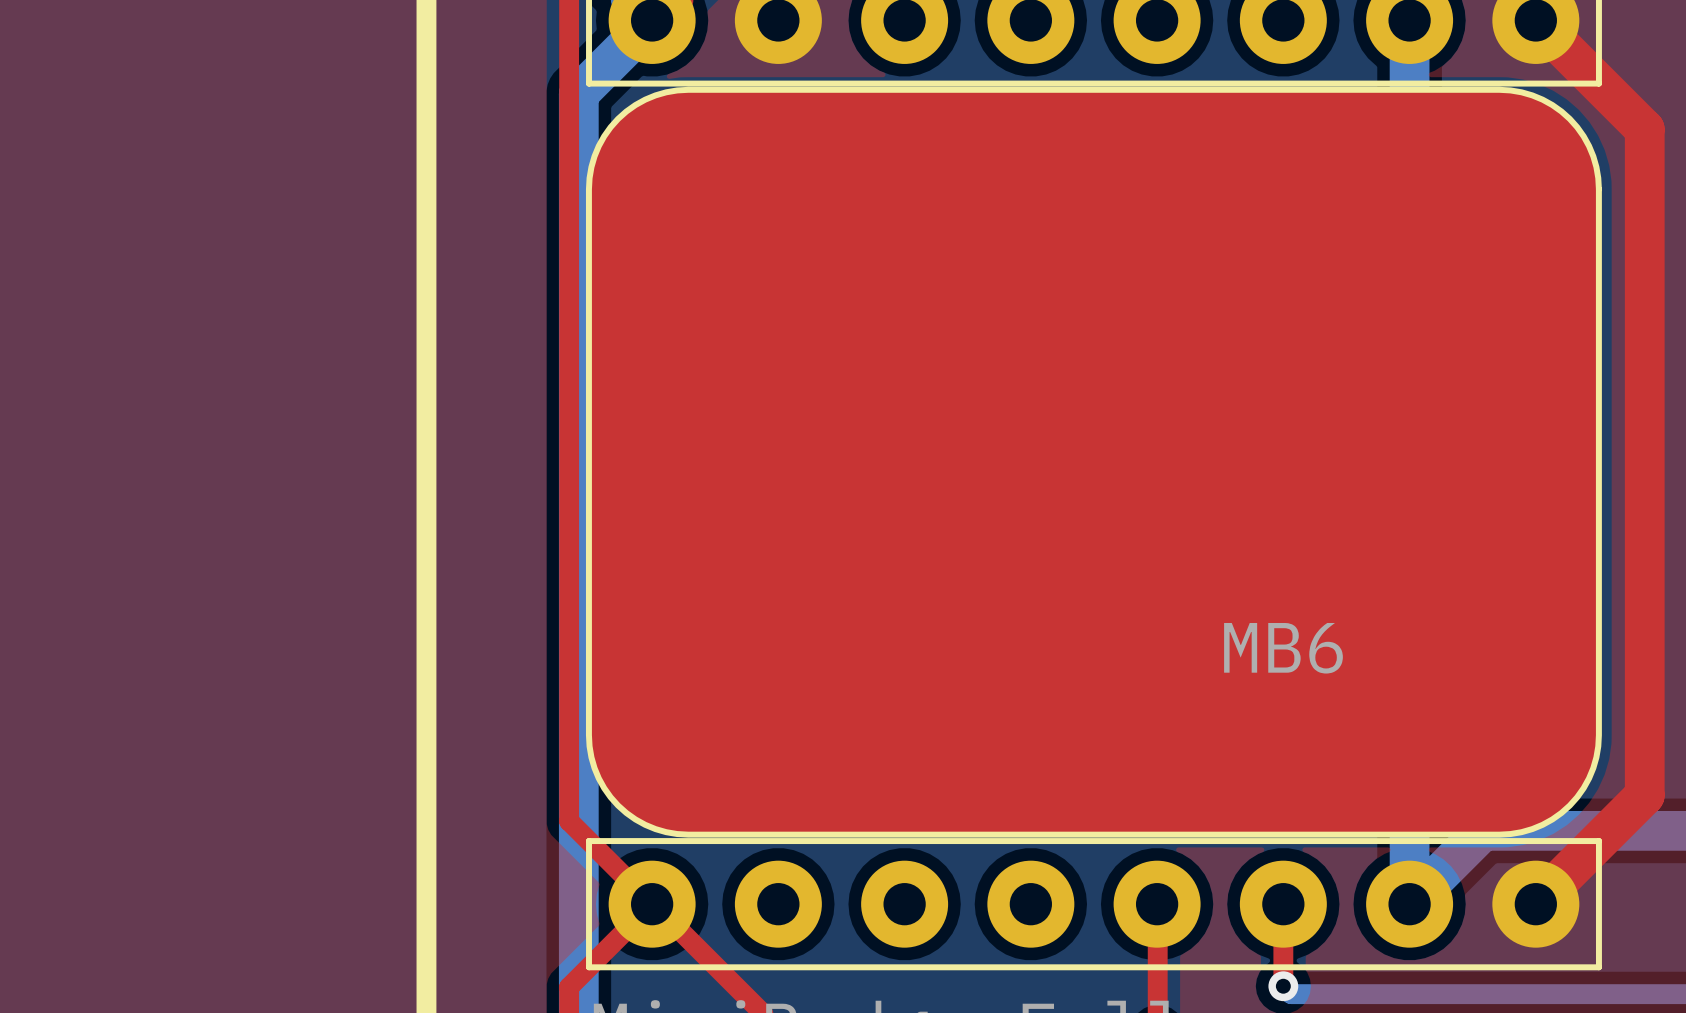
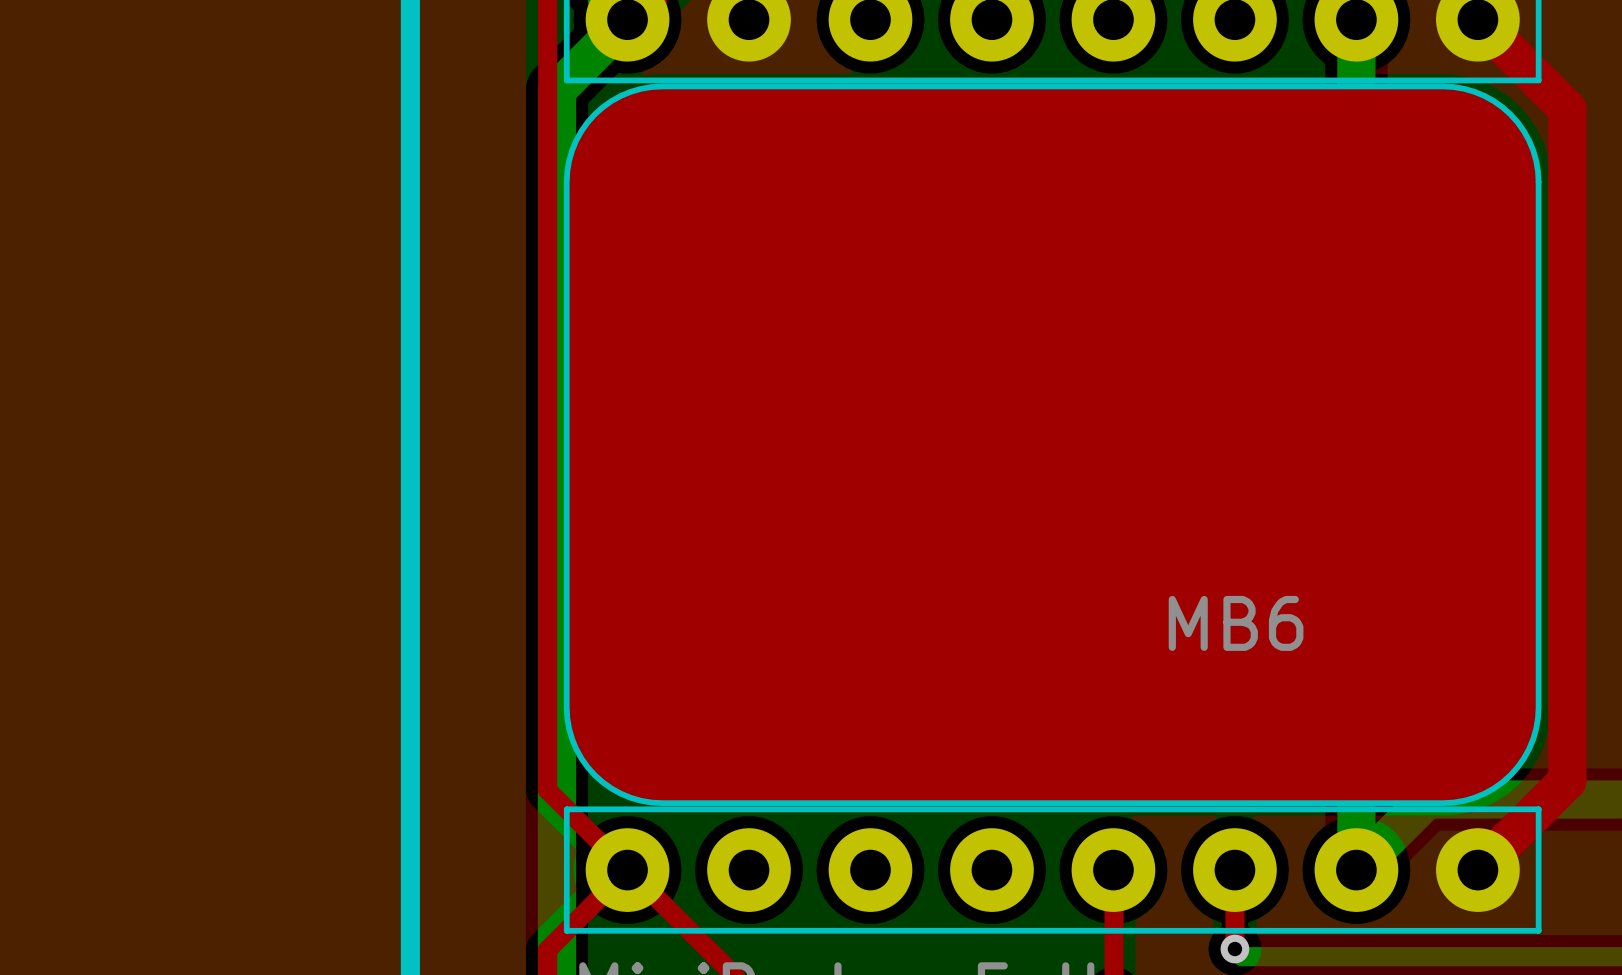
top track: (1628, 113) (1644, 129) (1644, 795) (1628, 811) -> (1567, 109) (1567, 780)

